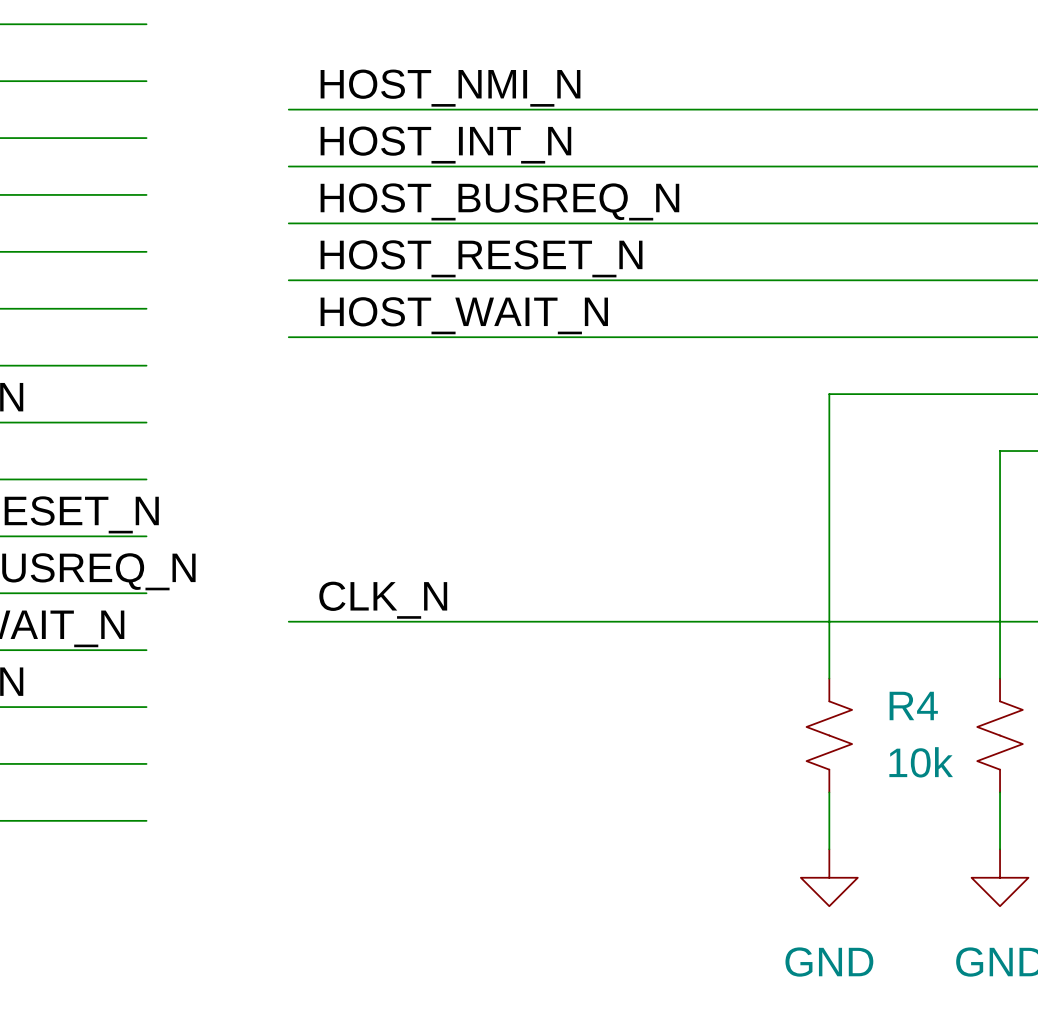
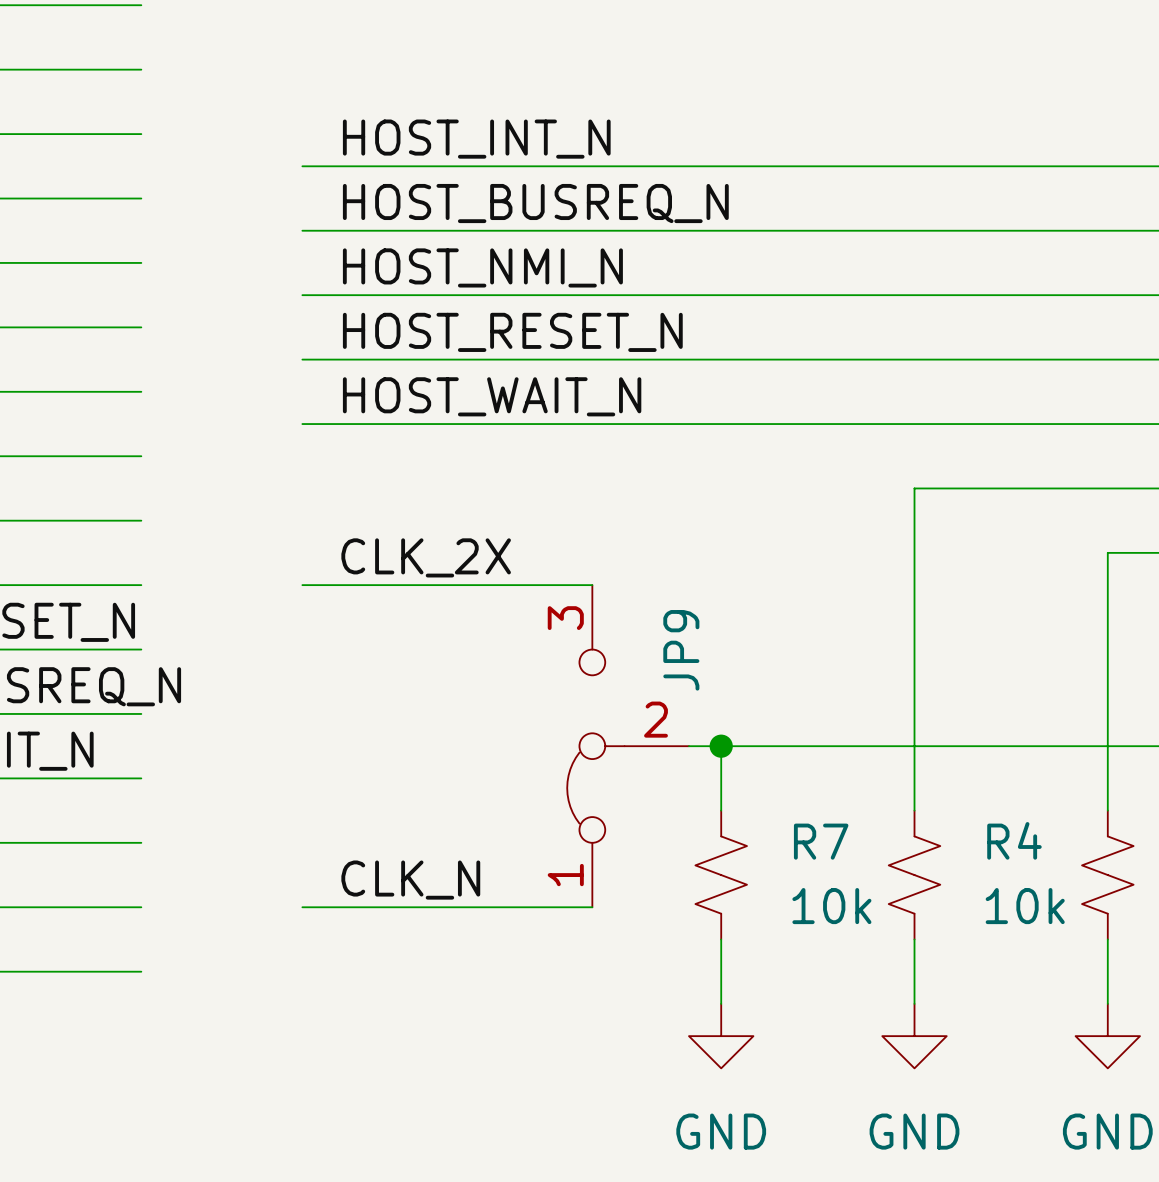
label: HOST_NMI_N (450, 88) -> HOST_INT_N (476, 139)
label: HOST_INT_N (445, 145) -> HOST_BUSREQ_N (535, 203)
label: HOST_BUSREQ_N (499, 201) -> HOST_NMI_N (482, 267)
label: none -> CLK_2X (426, 557)
wire: none -> (302, 585) (592, 585)
label position: CLK_N (383, 600) -> CLK_N (410, 880)
wire: (288, 621) (630, 621) -> none
JP9: none -> (628, 746)
wire: none -> (721, 746) (721, 810)
junction: none -> (721, 746)
R7: none -> 10k (721, 875)
wire: none -> (302, 907) (592, 907)
wire: none -> (721, 939) (721, 1003)
power symbol: none -> GND (721, 1036)

